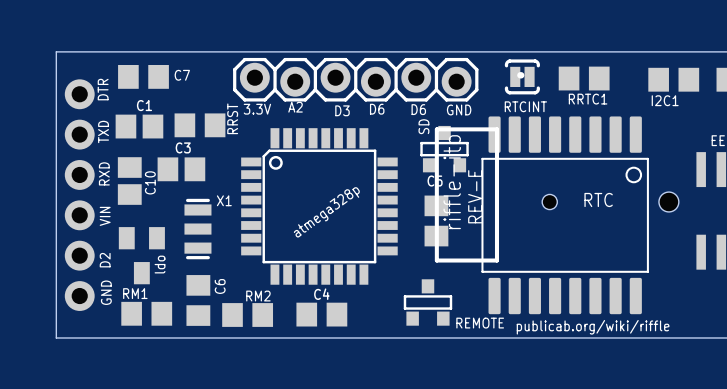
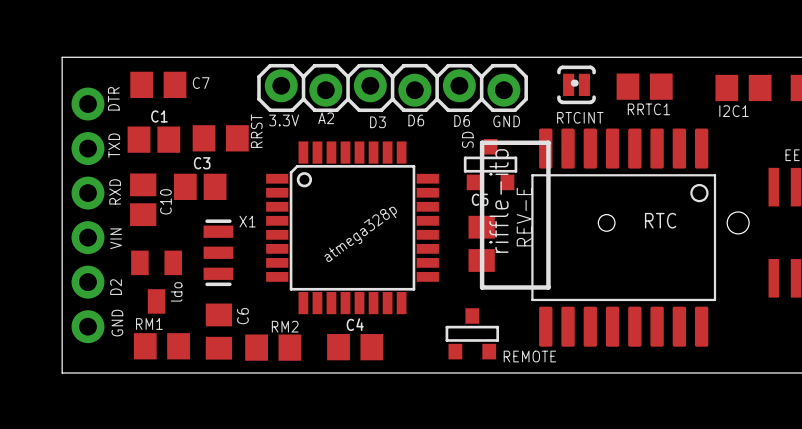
text: publicab.org/wiki/riffle (593, 327) -> none

